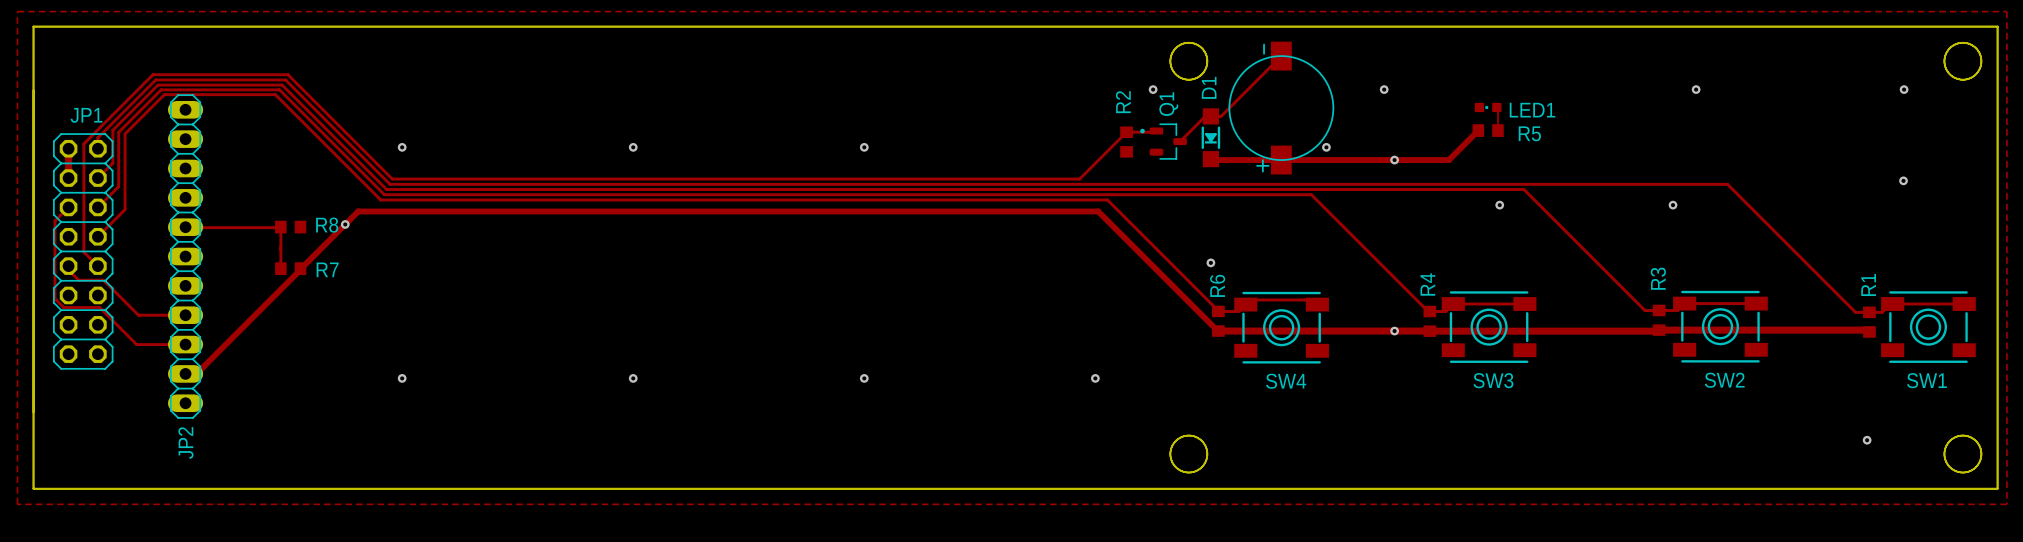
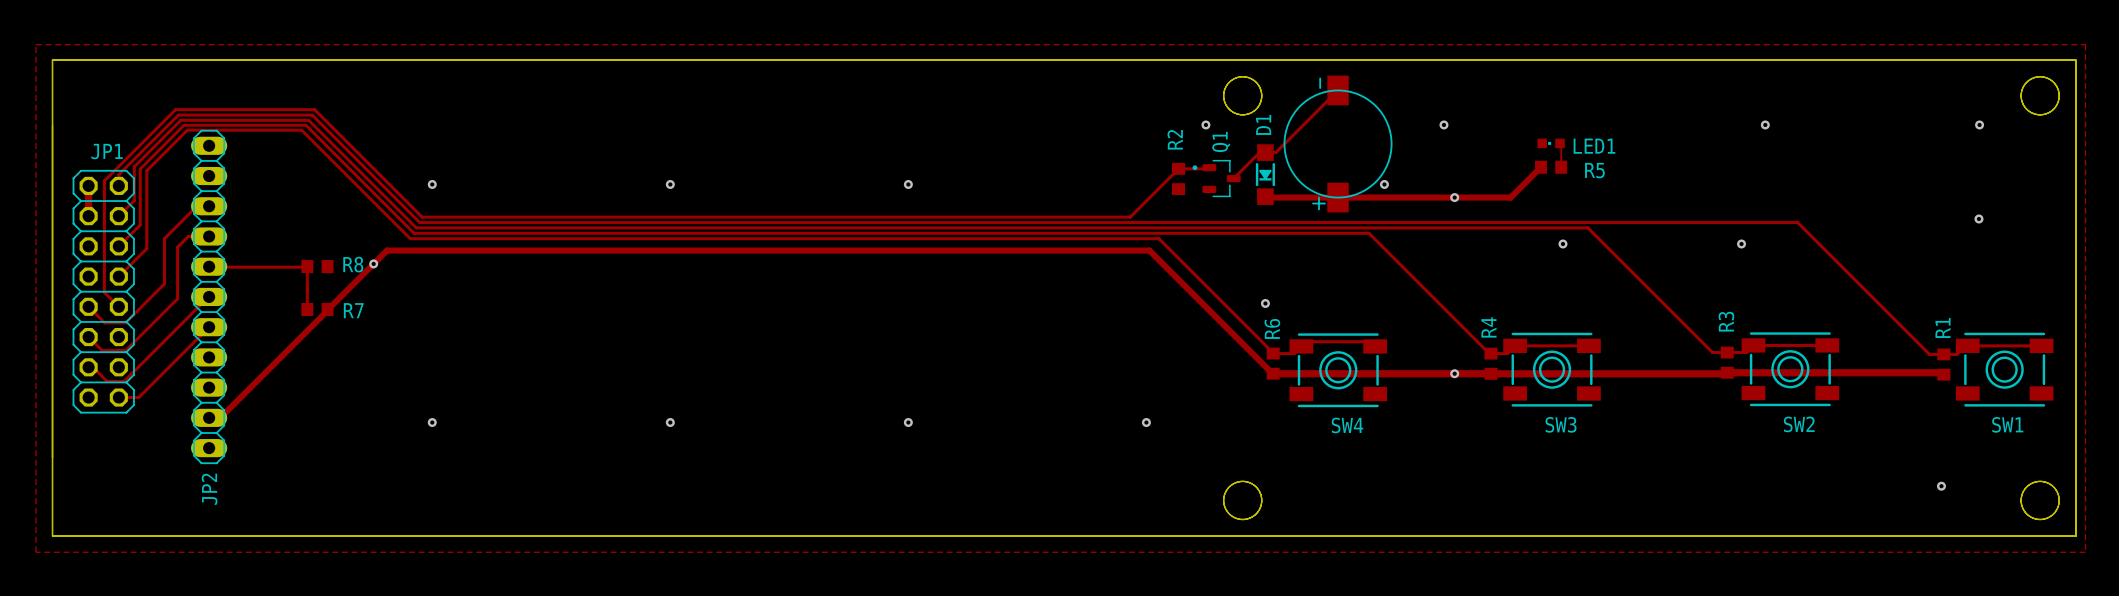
track: none -> (209, 236) (188, 236) (177, 247) (177, 298) (125, 350) (102, 350) (88, 337)
track: (68, 207) (54, 221) (54, 298) (56, 300) -> none
track: none -> (209, 296) (124, 381) (107, 381) (87, 361) (88, 367)
track: (68, 266) (68, 270) (78, 280) (103, 280) (138, 315) (185, 315) -> (88, 306) (104, 322) (125, 322) (164, 283) (164, 238) (196, 206) (209, 206)
track: none -> (209, 327) (138, 397) (118, 397)
track: (56, 300) (63, 307) (99, 307) (136, 344) (185, 344) -> none

